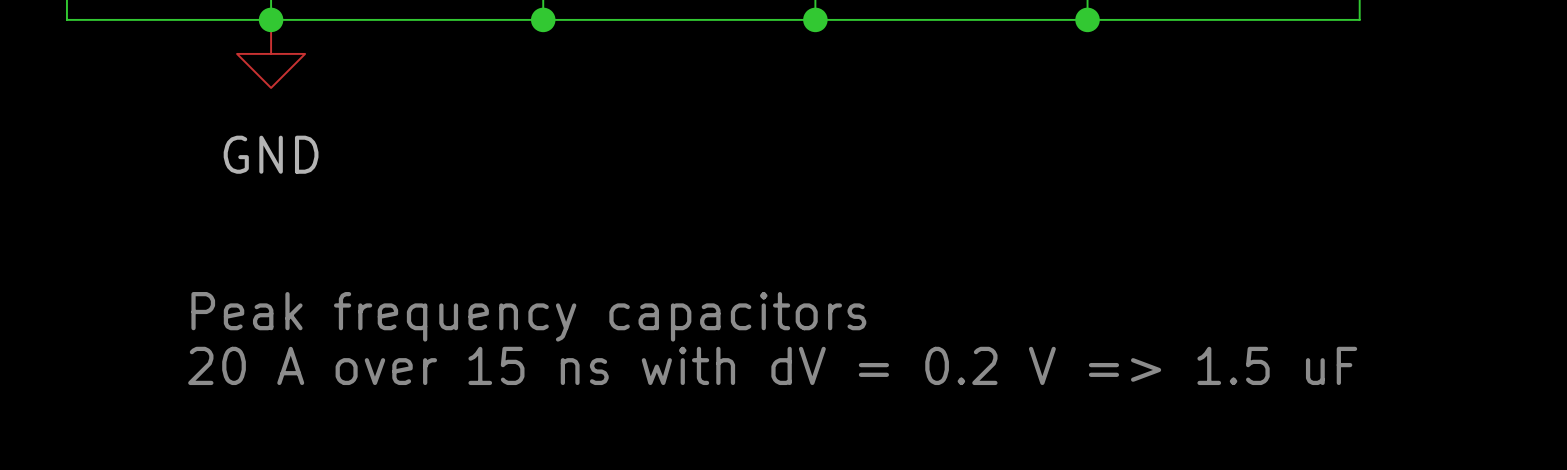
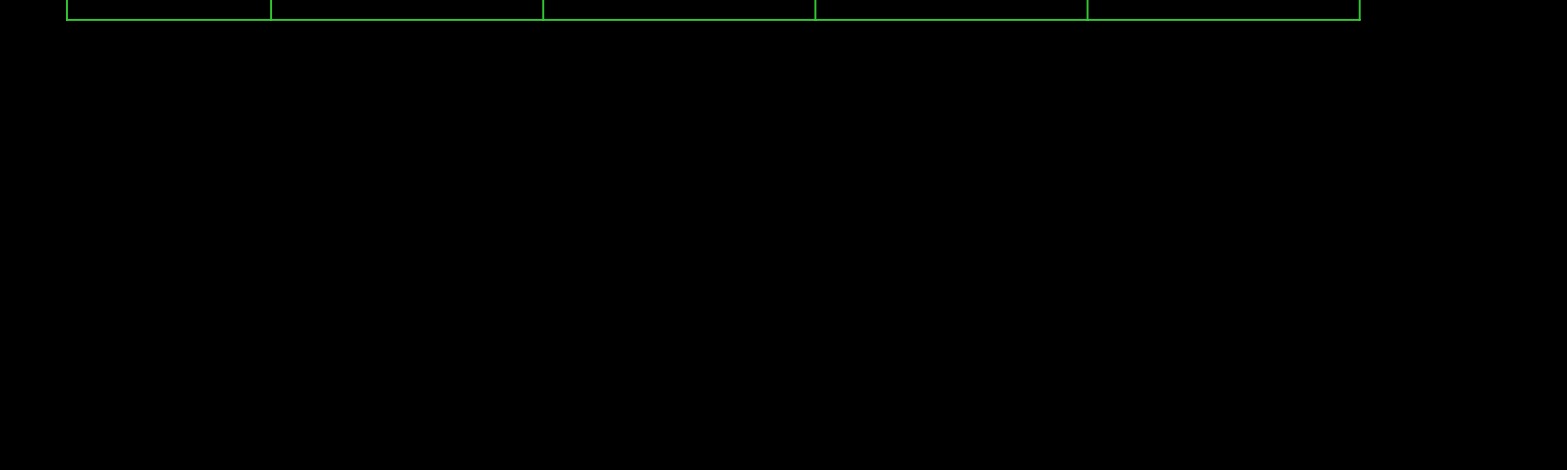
junction: (271, 19) -> none
junction: (543, 19) -> none
junction: (815, 19) -> none
junction: (1087, 19) -> none
power symbol: GND (271, 53) -> none
text: Peak frequency capacitors (528, 316) -> none
text: 20 A over 15 ns with dV = 0.2 V => 1.5 uF (772, 365) -> none

